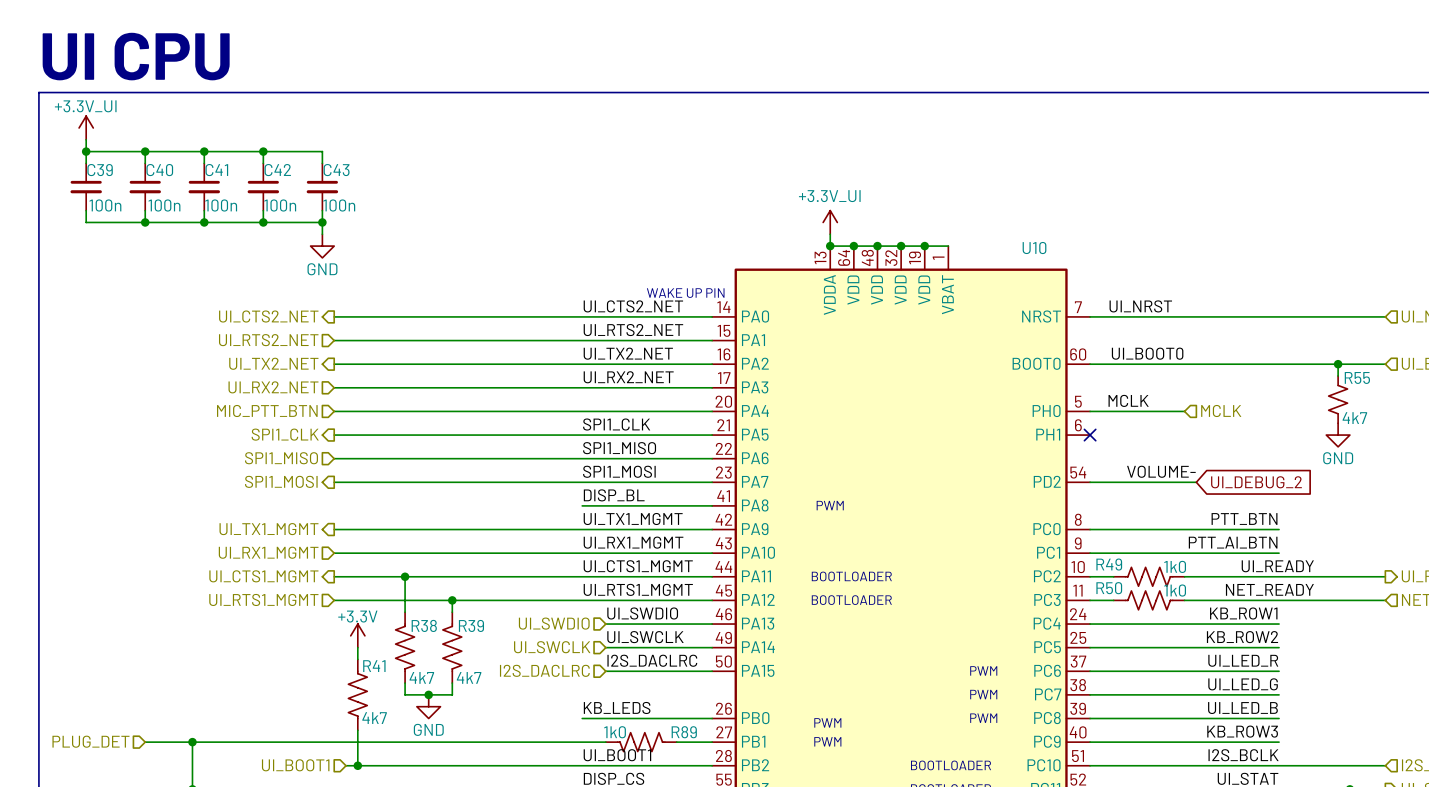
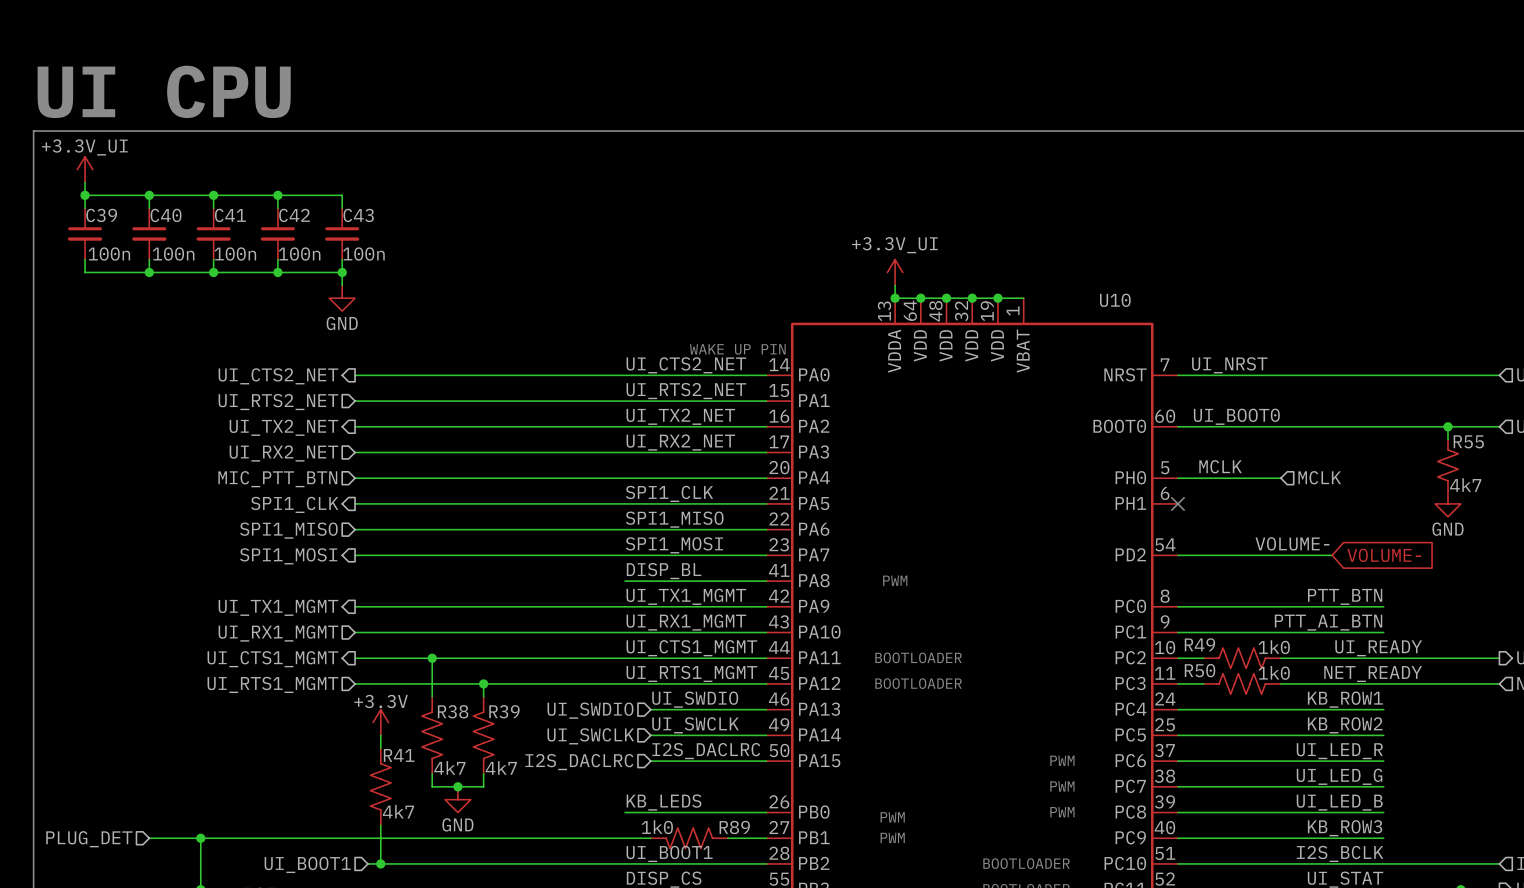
label position: VOLUME- (1161, 471) -> VOLUME- (1292, 543)
wire: none -> (1293, 555) (1332, 555)
global label: UI_DEBUG_2 (1256, 482) -> none
global label: none -> VOLUME- (1384, 555)

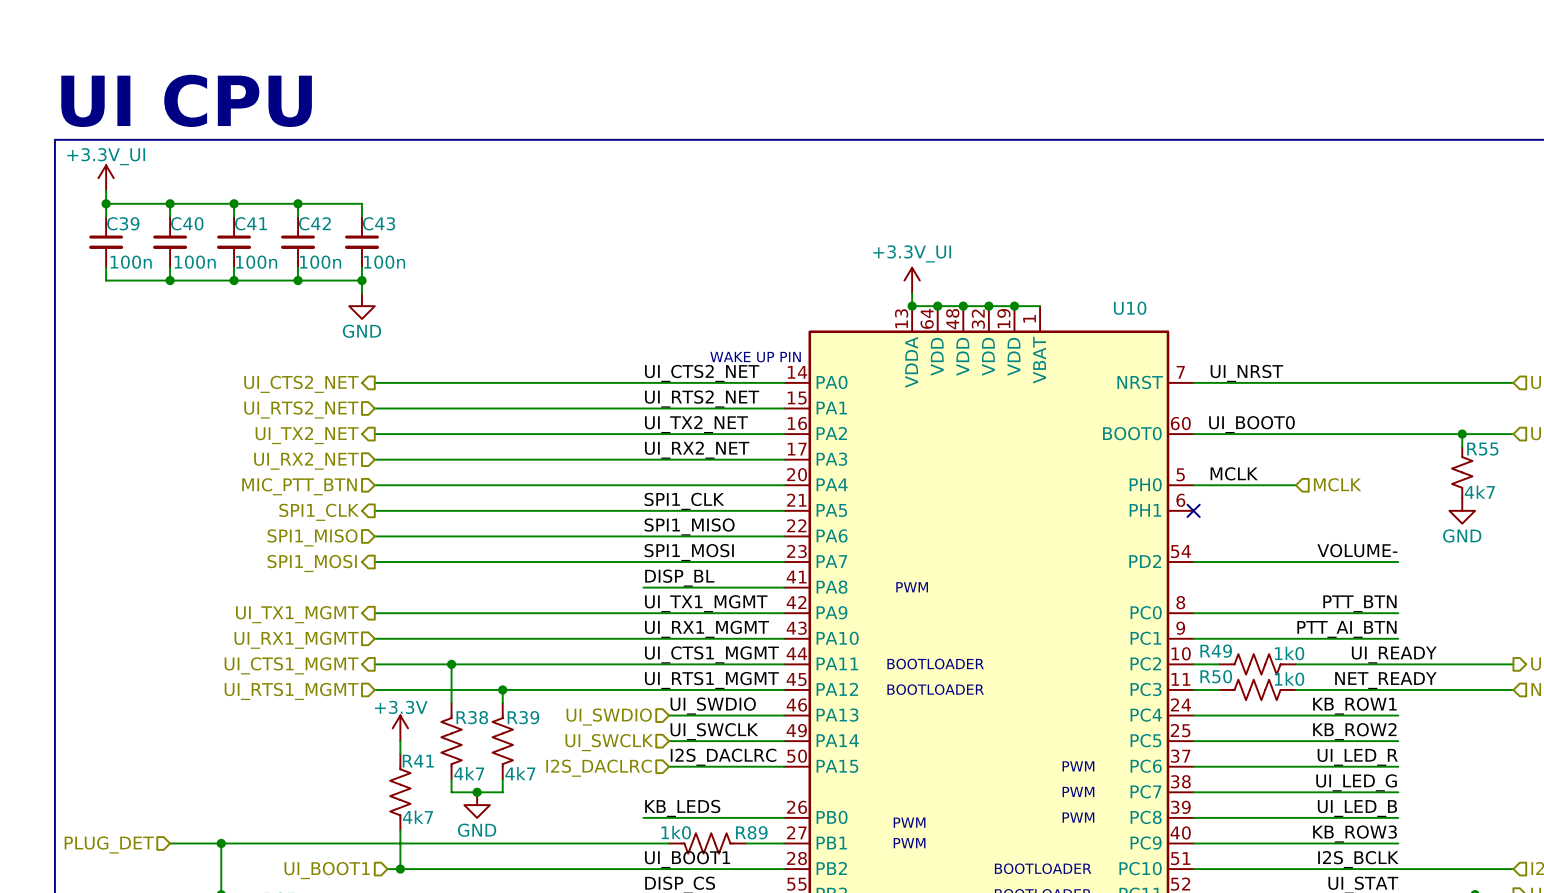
label position: VOLUME- (1292, 543) -> VOLUME- (1357, 550)
wire: none -> (1347, 562) (1398, 562)
global label: VOLUME- (1384, 555) -> none

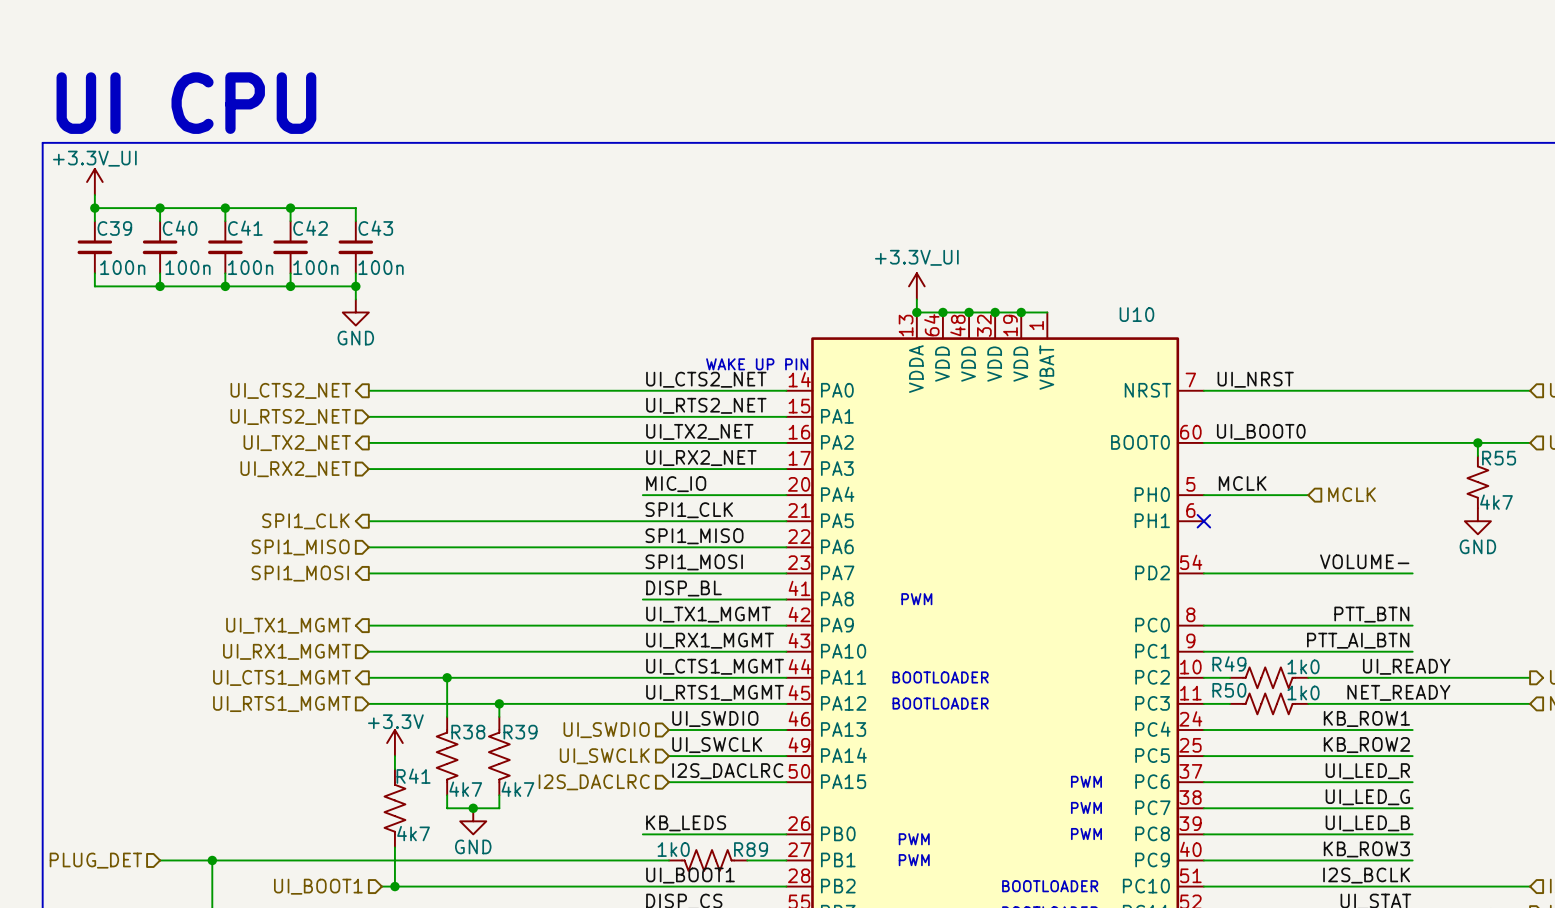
label: none -> MIC_IO (676, 484)
wire: (374, 485) (643, 485) -> none
hierarchical label: MIC_PTT_BTN (299, 486) -> none

